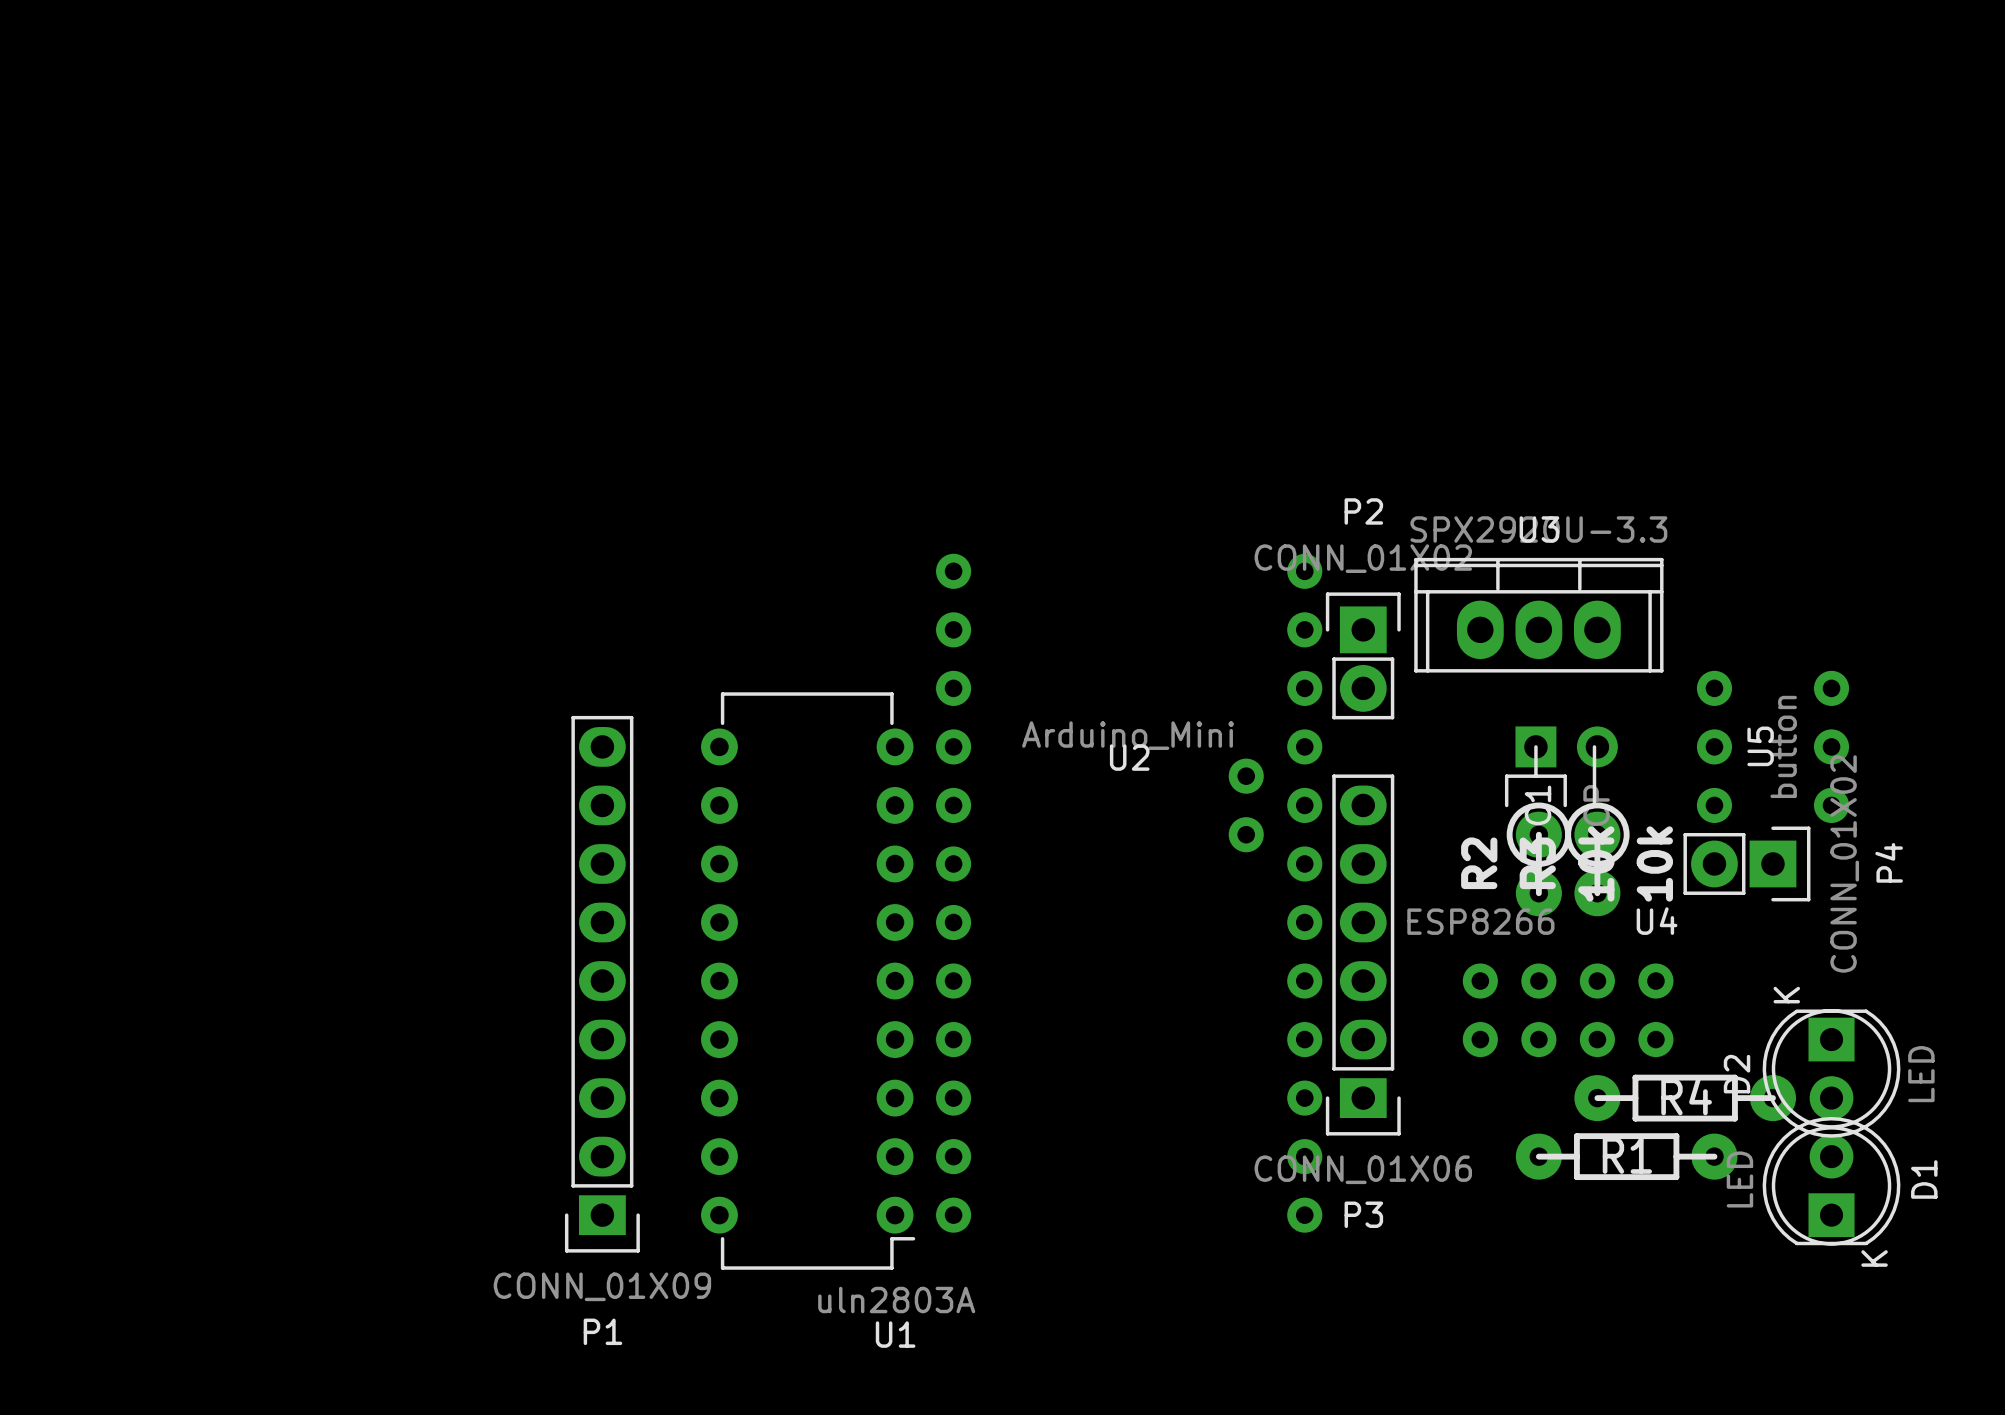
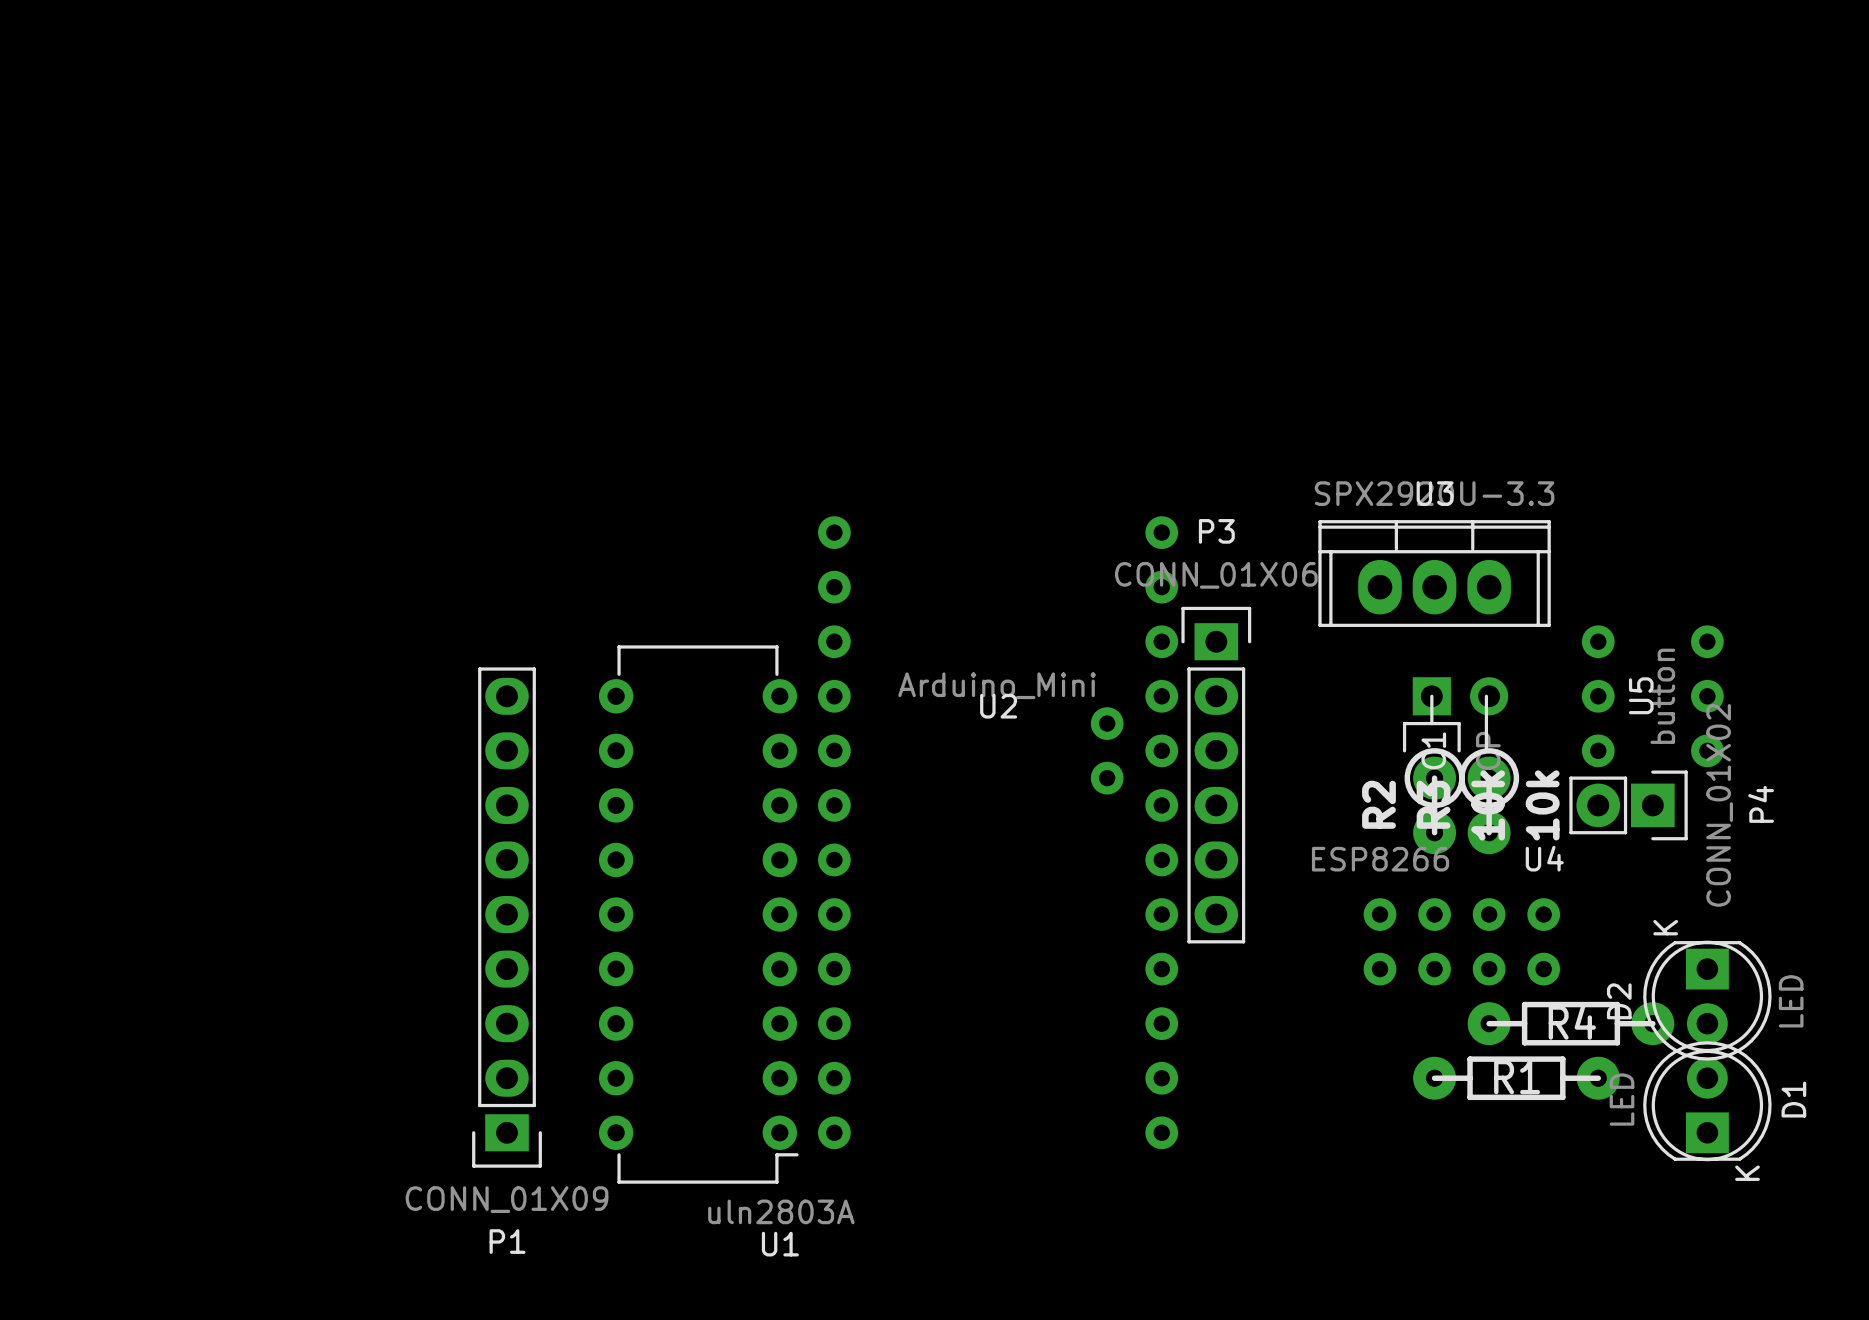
P2: CONN_01X02 (1363, 655) -> none
U2 position: (1129, 893) -> (998, 832)
P3 rotation: 0° (1363, 954) -> 180° (1216, 775)
U1 position: (808, 981) -> (698, 914)
P1 position: (602, 984) -> (507, 917)

